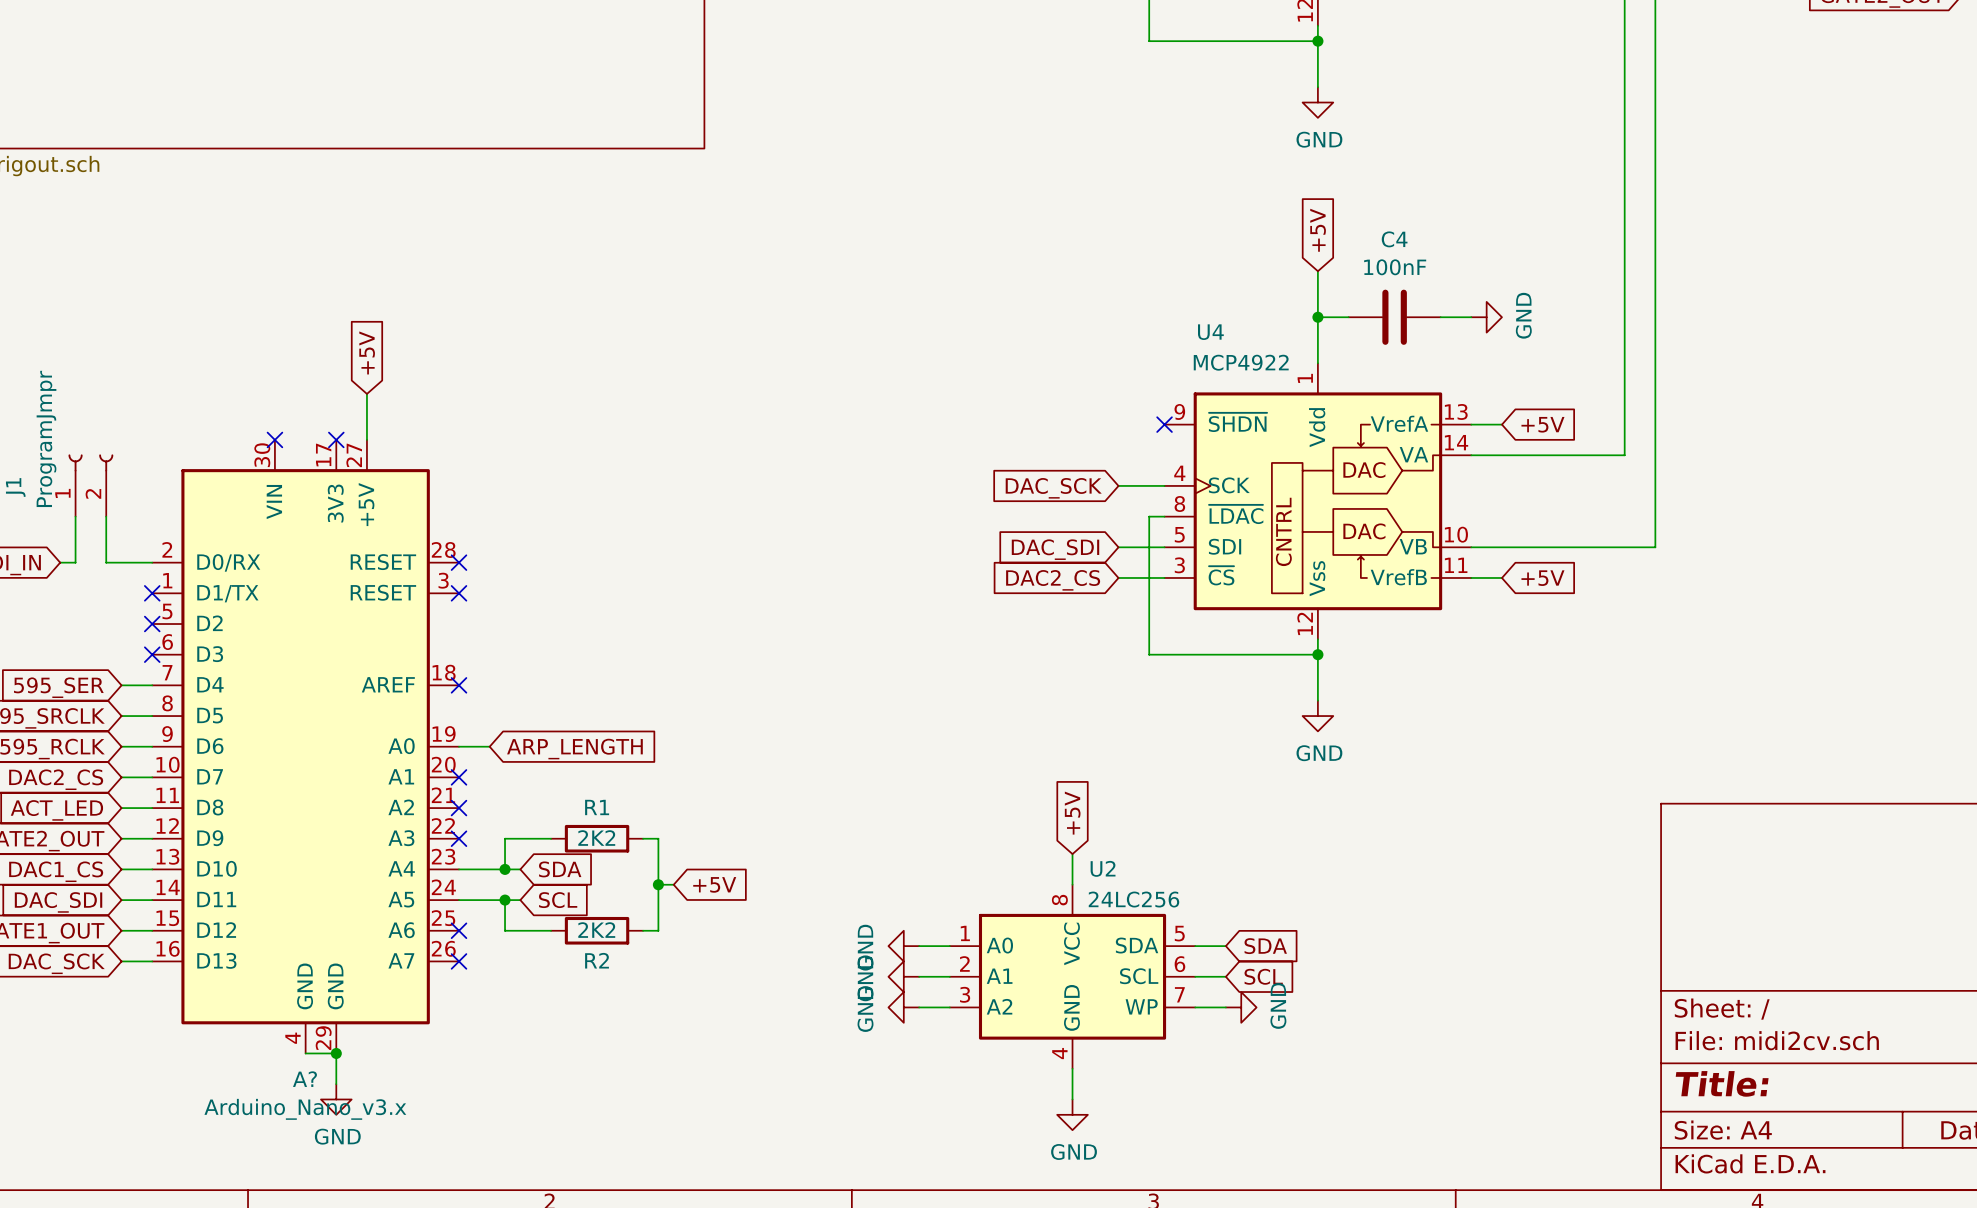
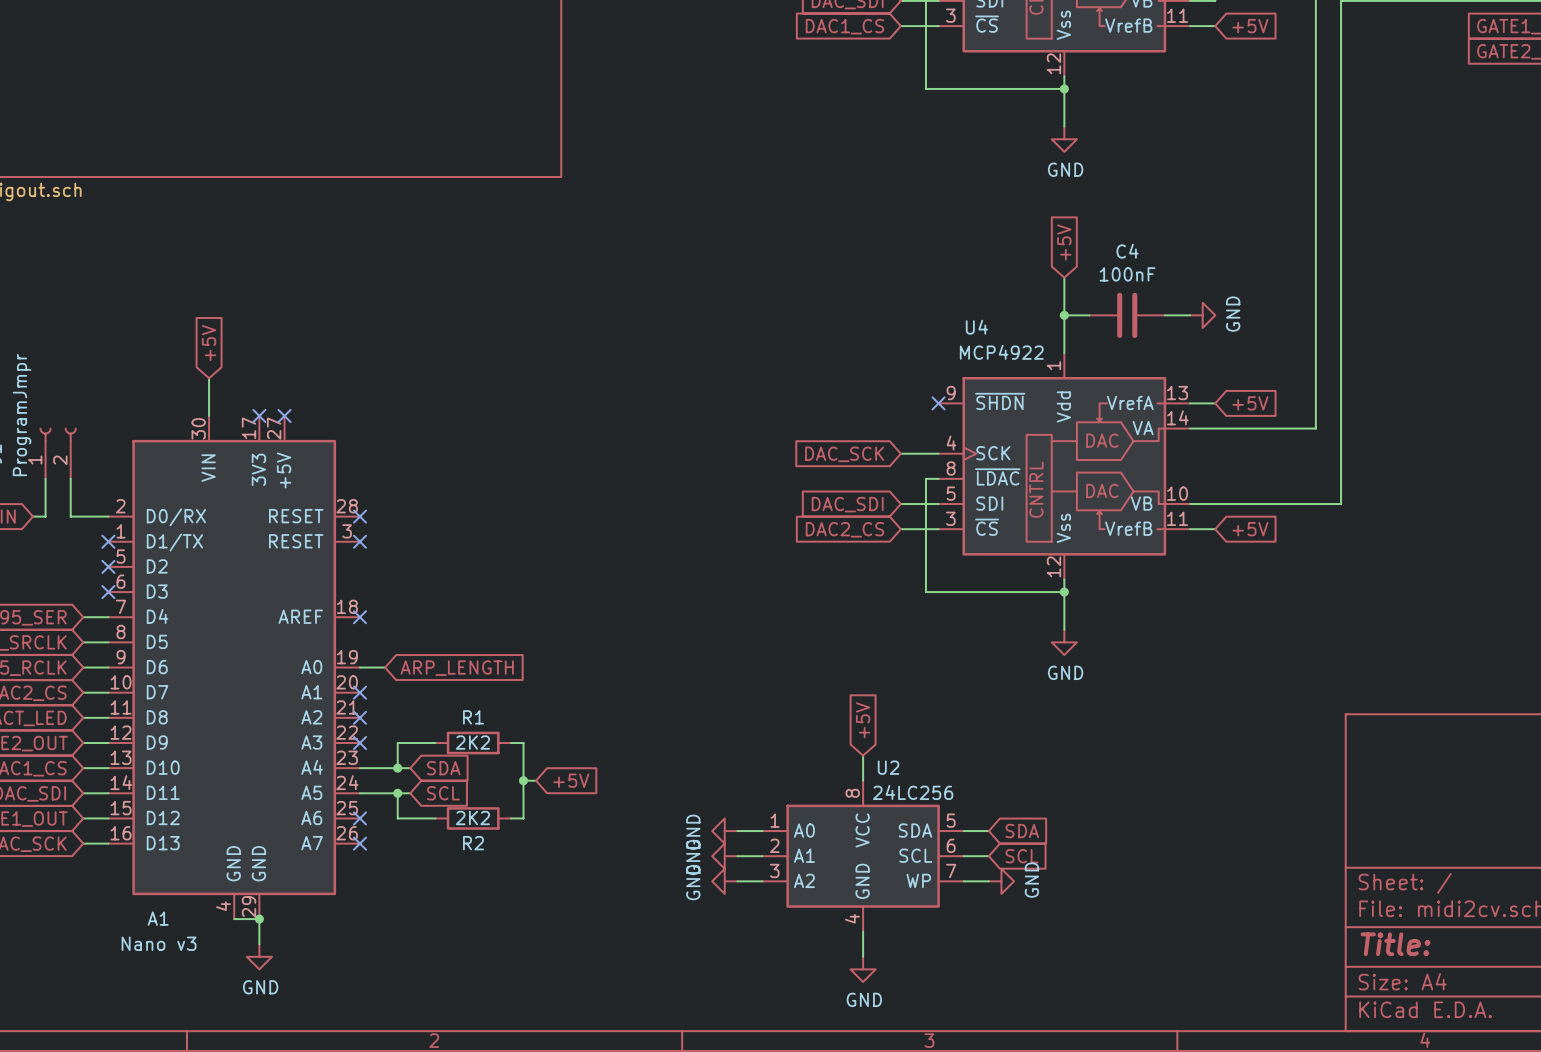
global label position: +5V (367, 352) -> +5V (209, 343)
wire: (366, 393) (366, 439) -> (209, 378) (209, 415)
no-connect mark: (274, 439) -> none
no-connect mark: none -> (284, 415)
A? name: A? (304, 1079) -> A1 (158, 918)
A? value: Arduino_Nano_v3.x (305, 1109) -> Nano v3 (159, 943)

